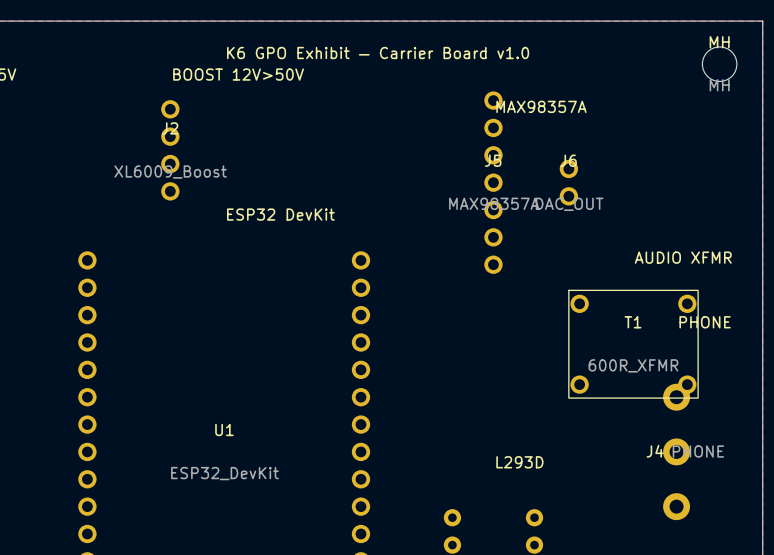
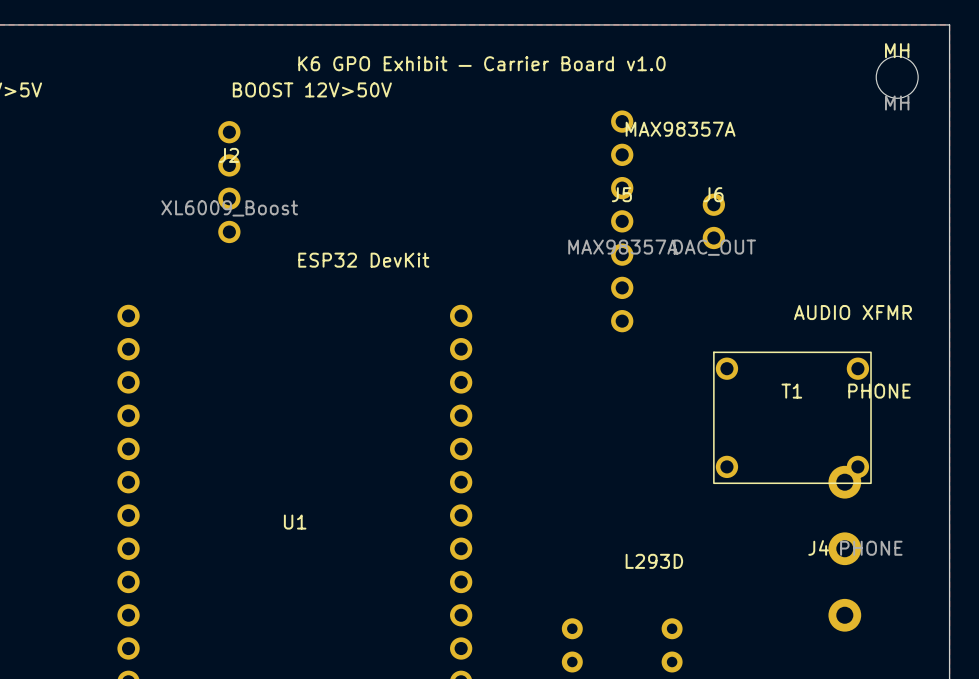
T1 value: 600R_XFMR (633, 365) -> none
U1 value: ESP32_DevKit (224, 473) -> none

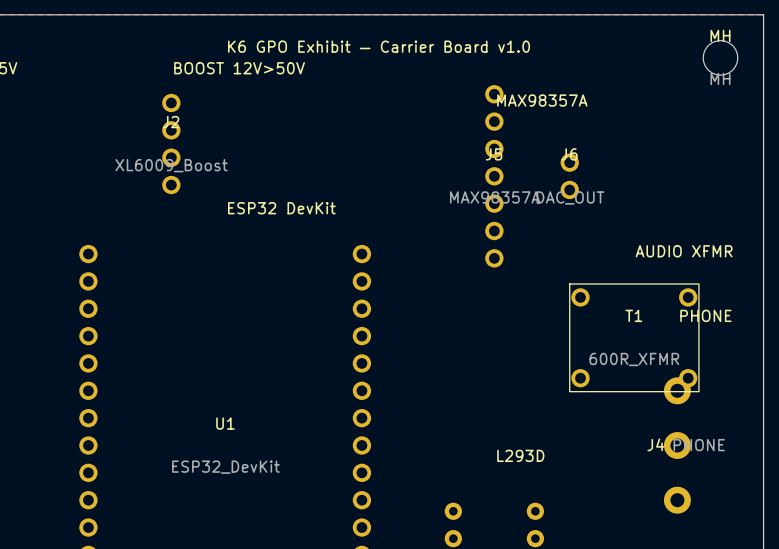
T1 value: none -> 600R_XFMR (634, 359)
U1 value: none -> ESP32_DevKit (225, 467)

